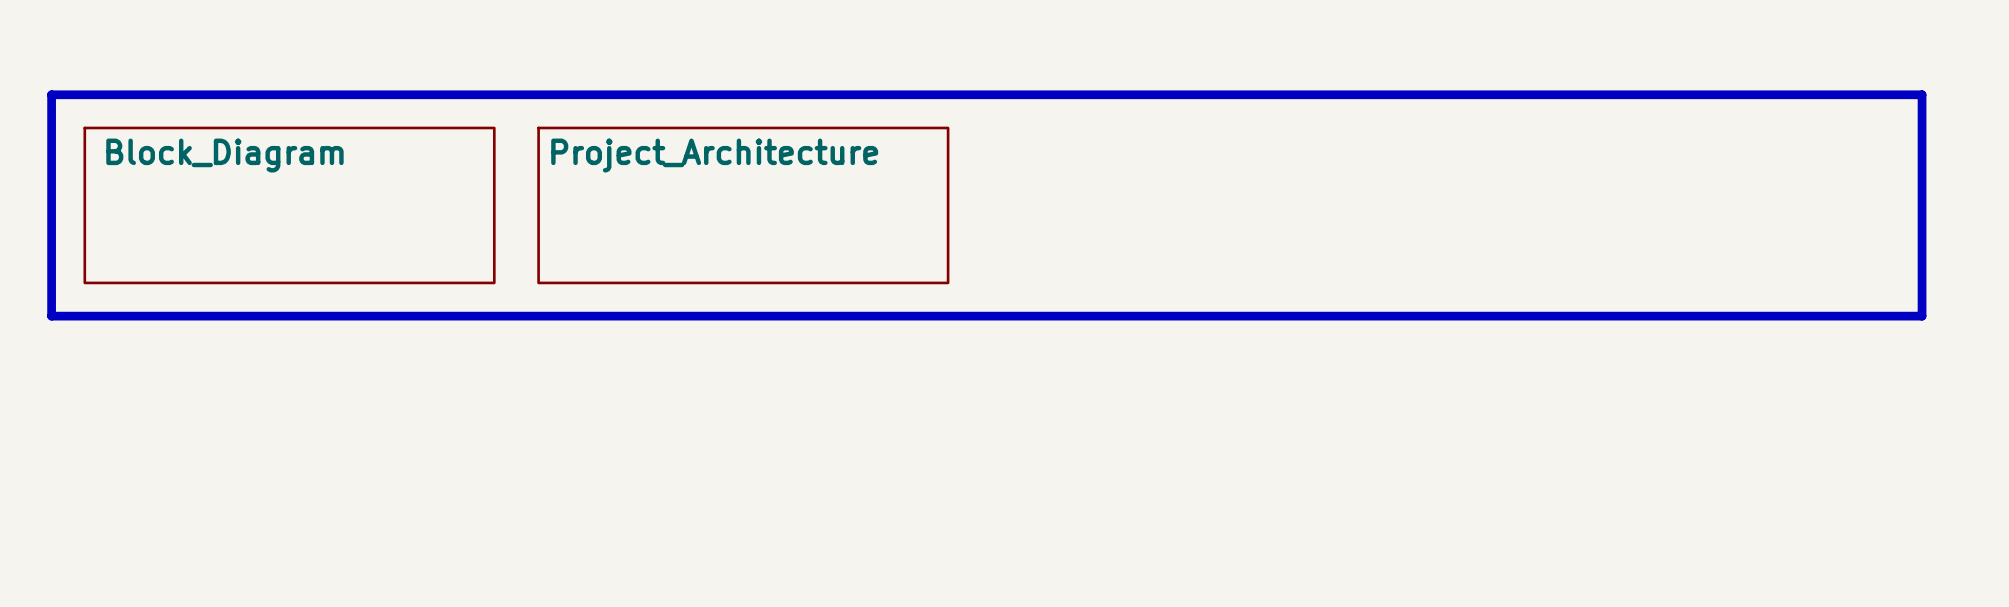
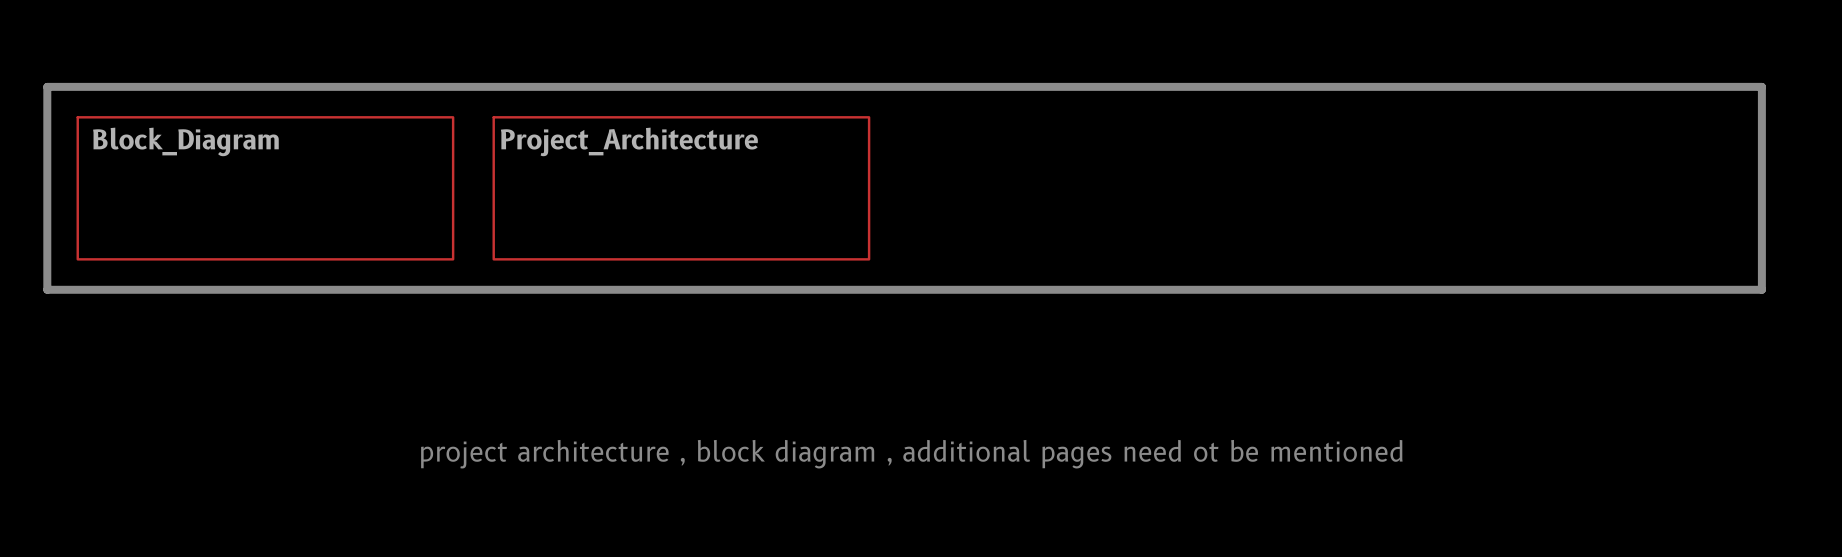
text: none -> project architecture , block diagram , additional pages need ot be mentioned (911, 454)

